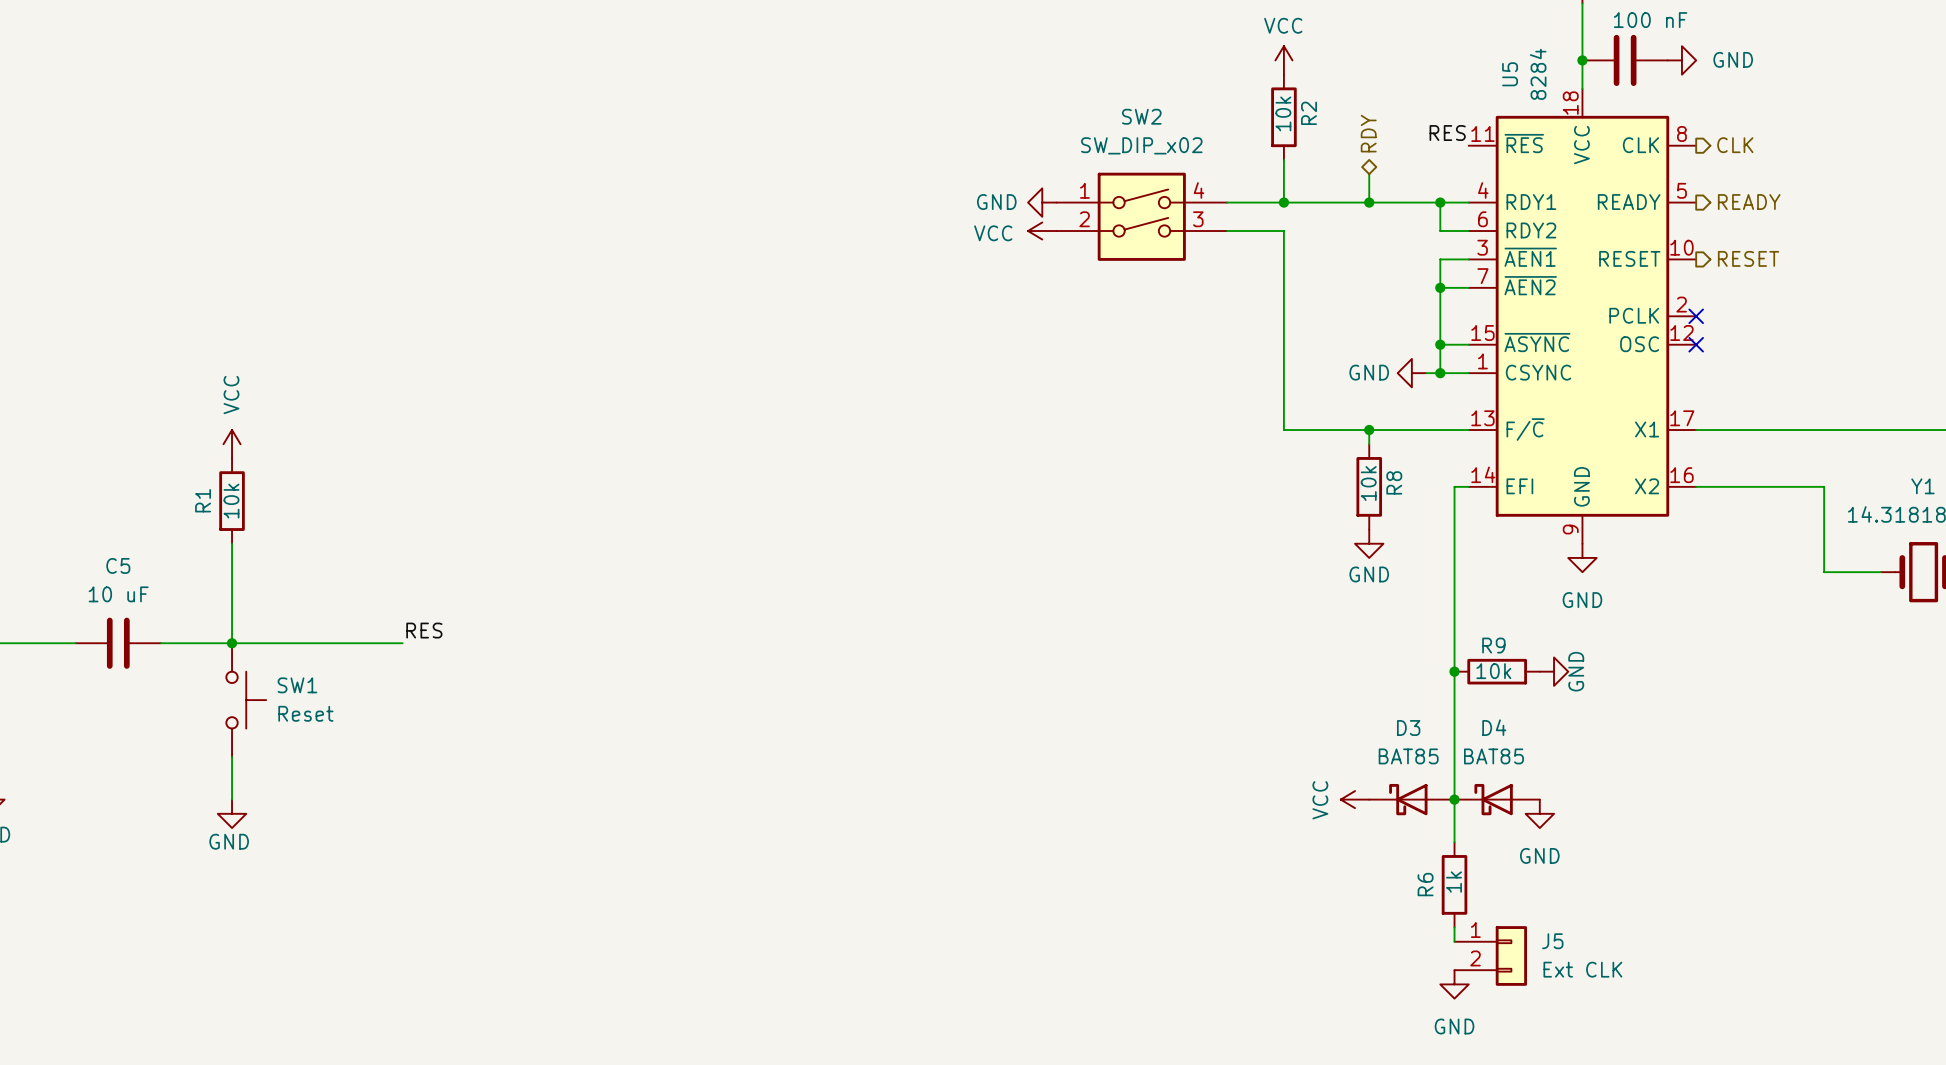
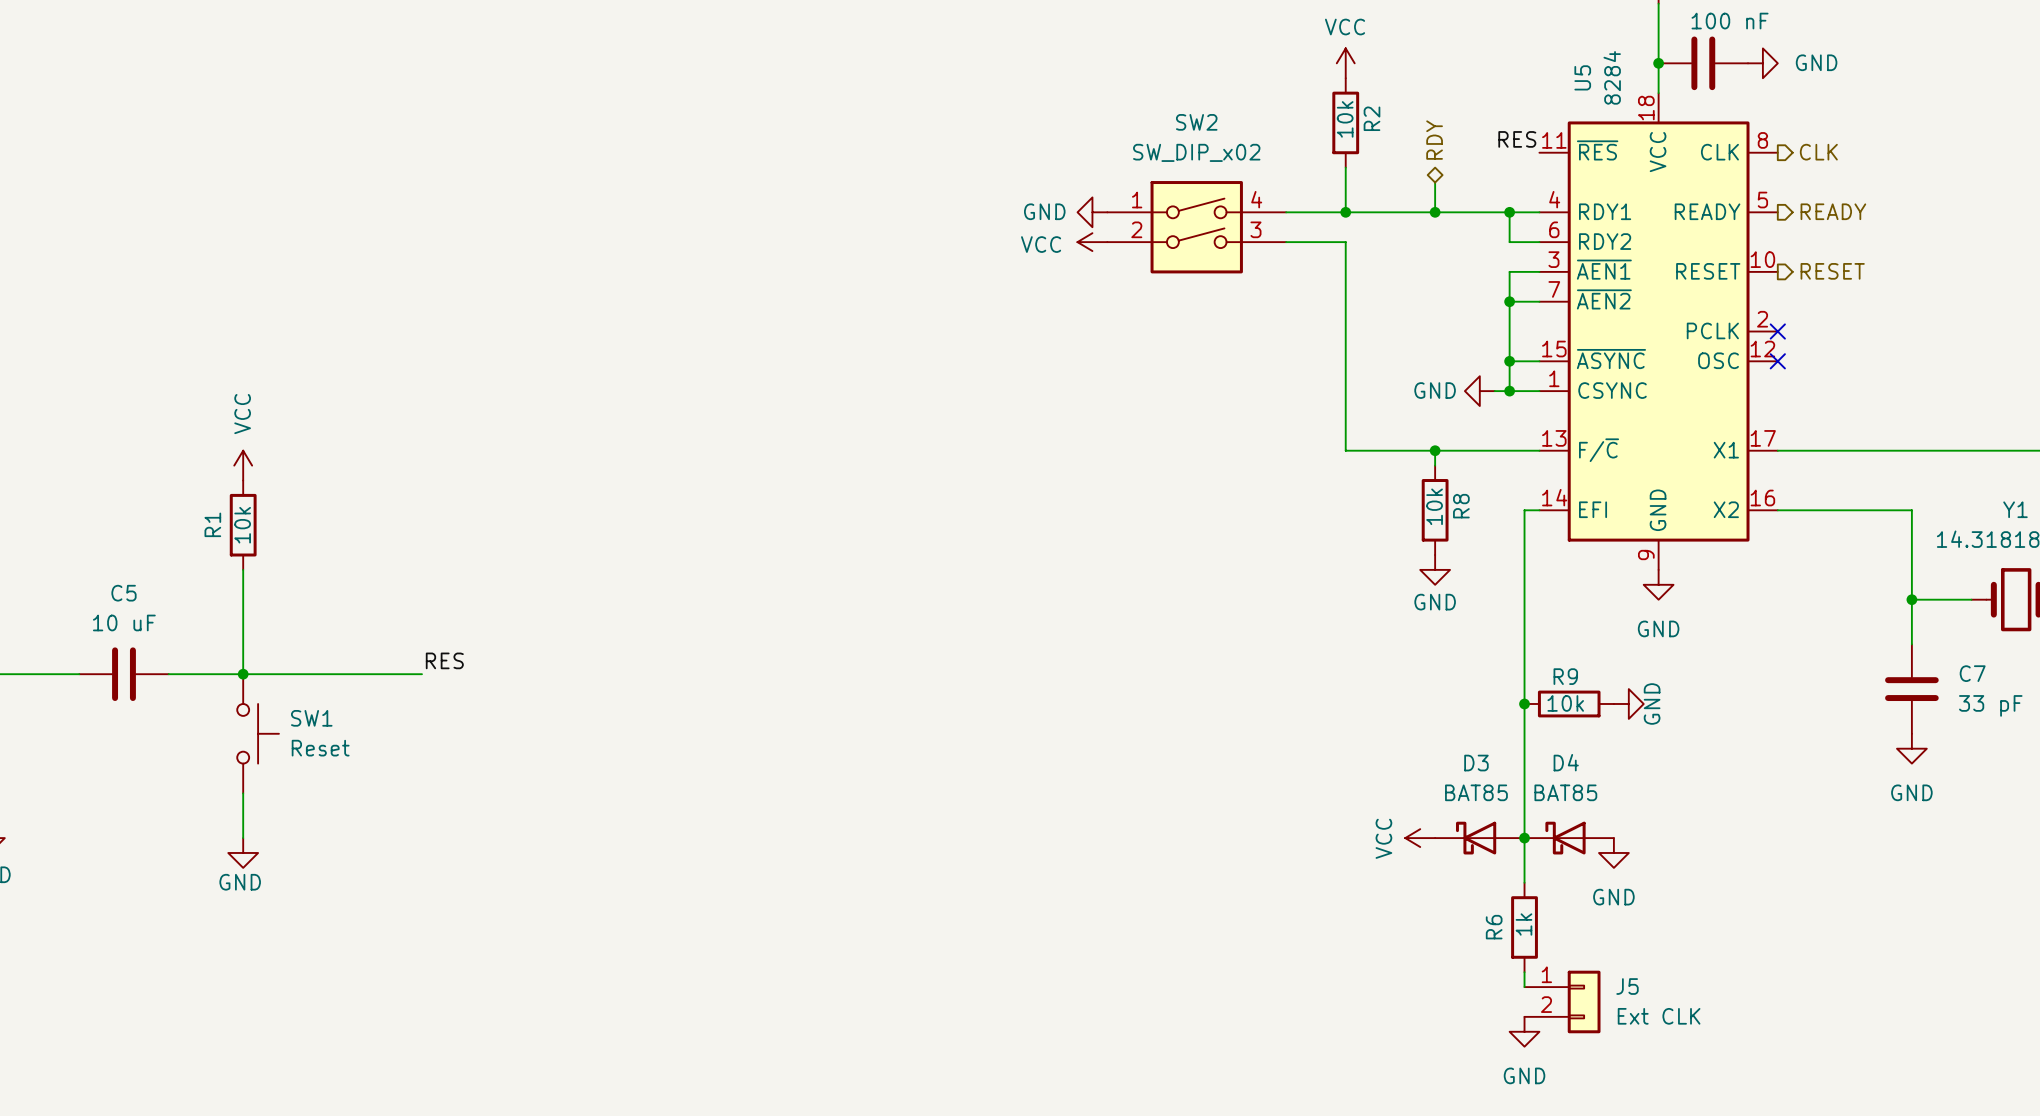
wire: none -> (1911, 599) (1911, 644)
junction: none -> (1911, 599)
C7: none -> 33 pF (1911, 689)
power symbol: none -> GND (1911, 748)

